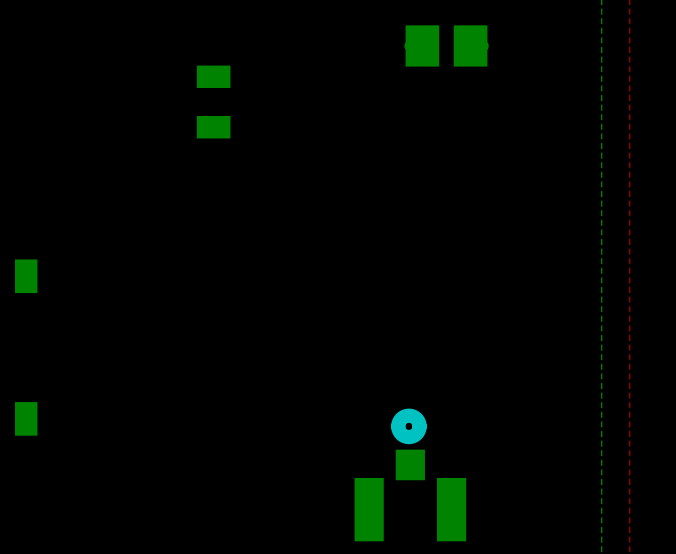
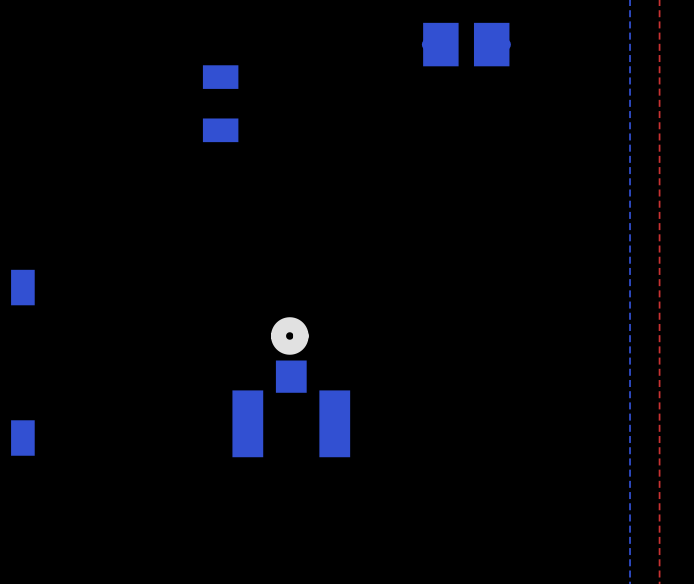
part position: (410, 474) -> (291, 387)

